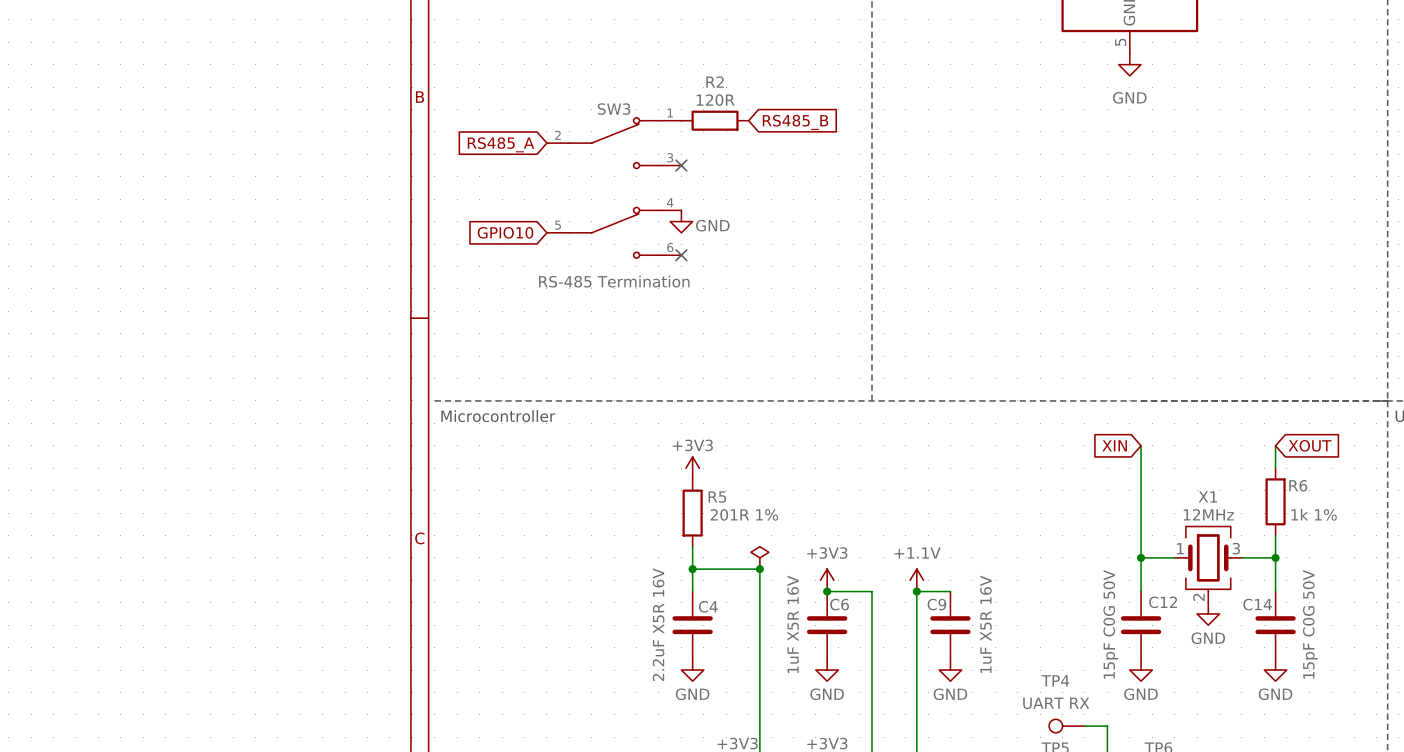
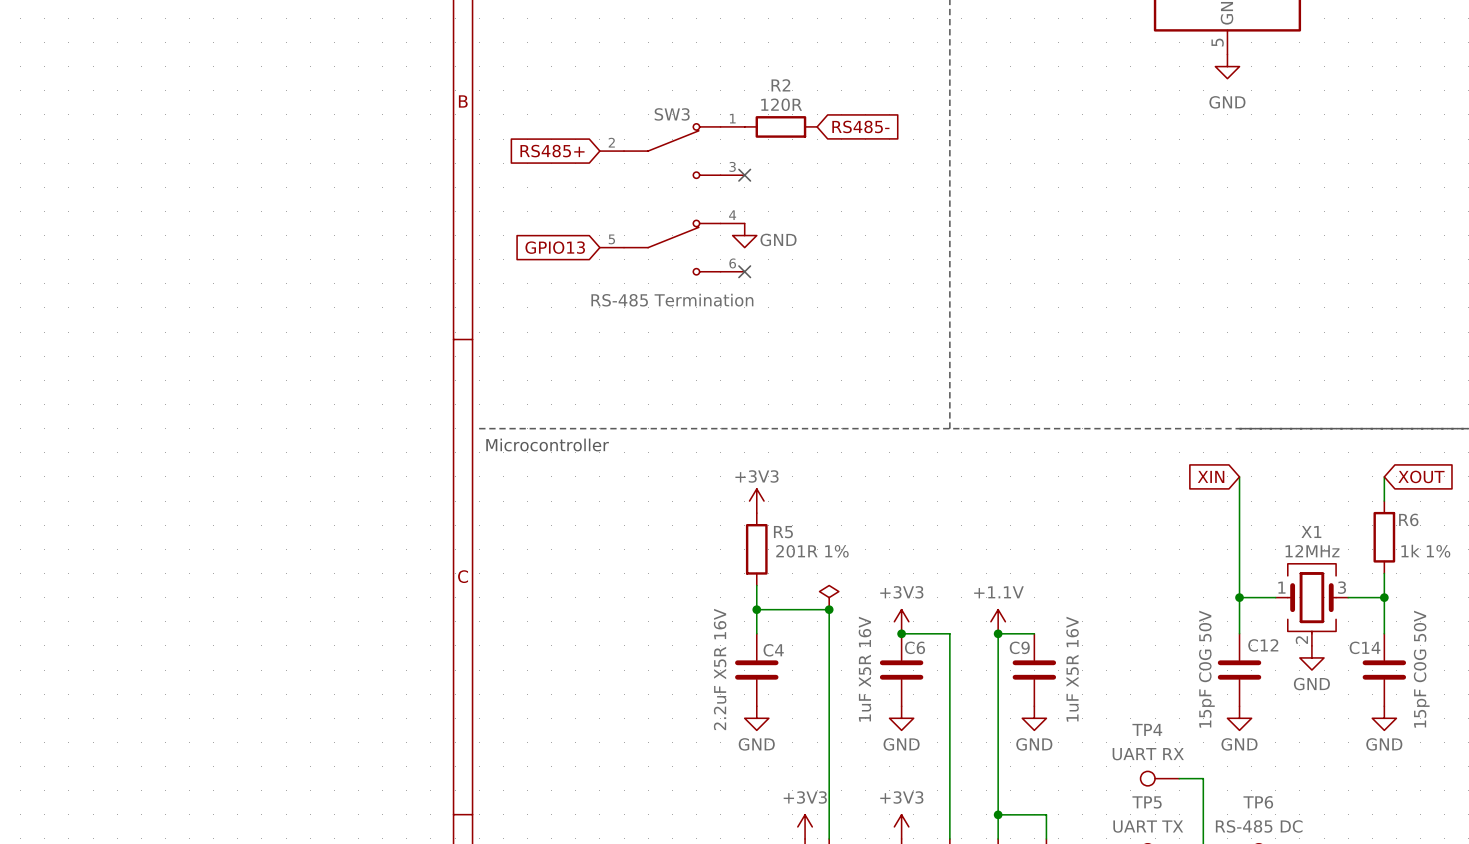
global label: RS485_B (795, 122) -> RS485- (860, 126)
global label: RS485_A (500, 144) -> RS485+ (552, 151)
global label: GPIO10 (505, 232) -> GPIO13 (555, 247)

